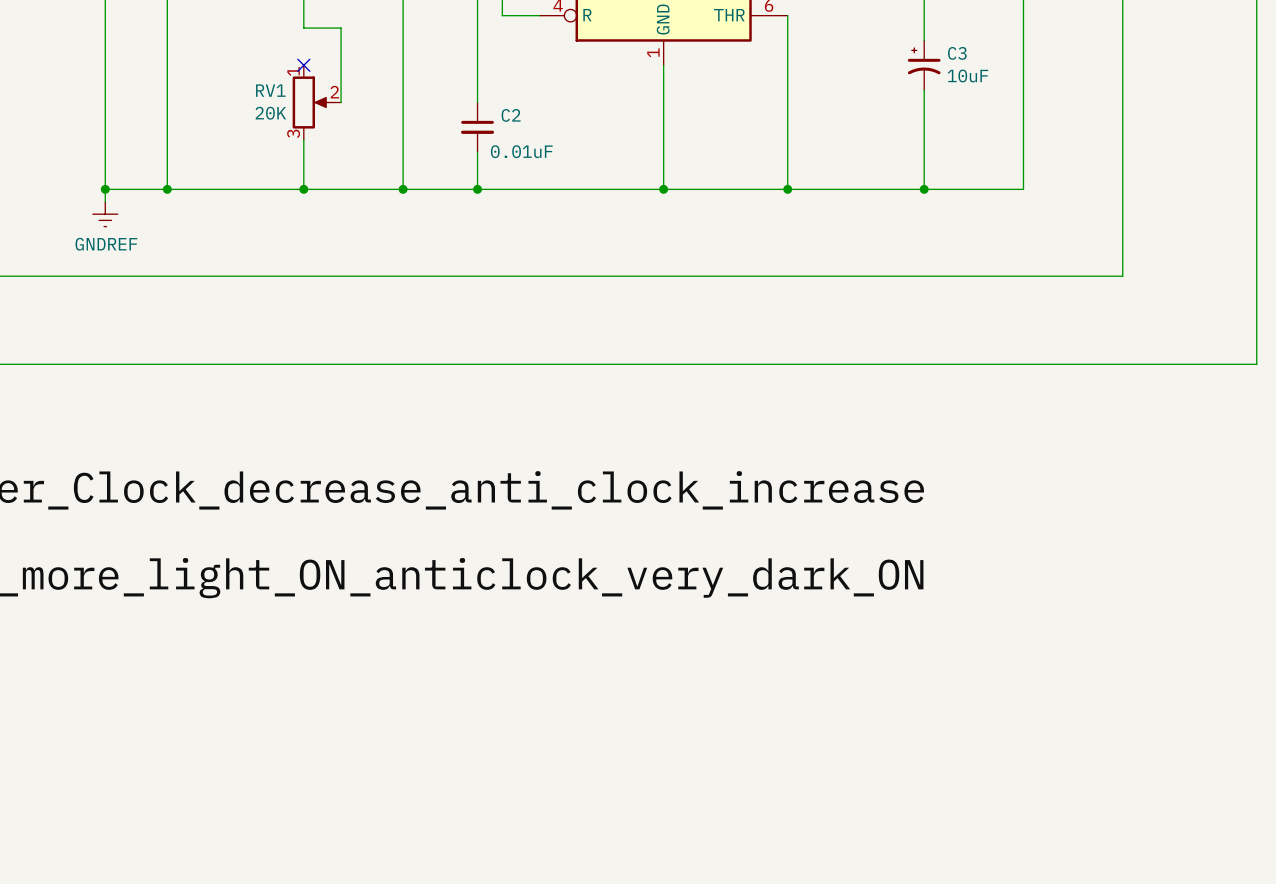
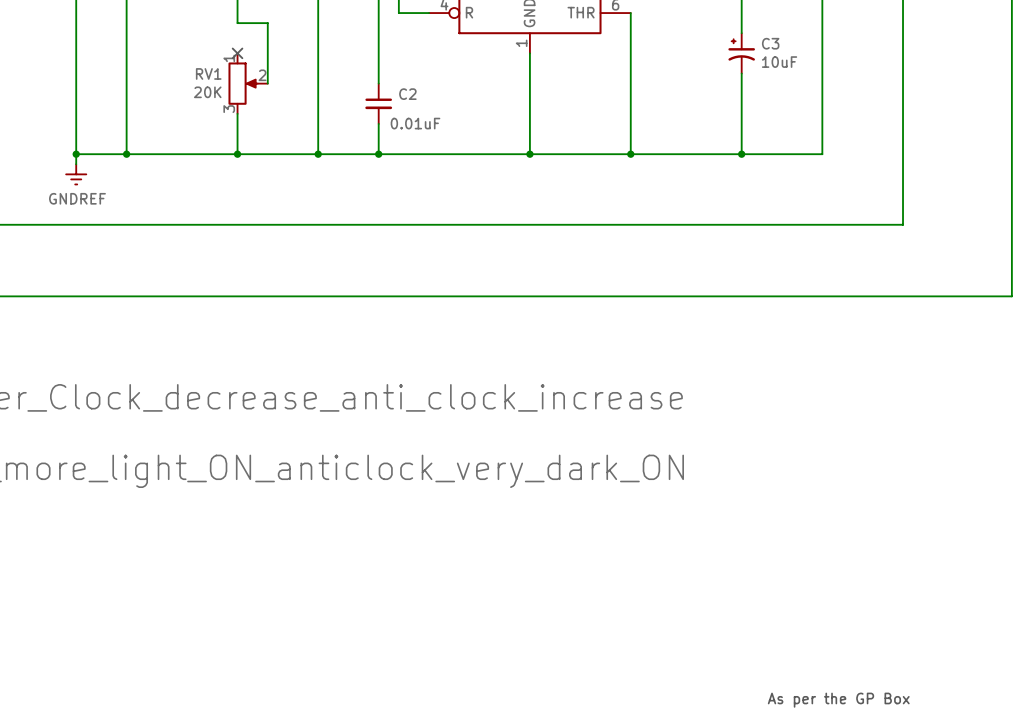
text: none -> As per the GP Box (838, 700)

